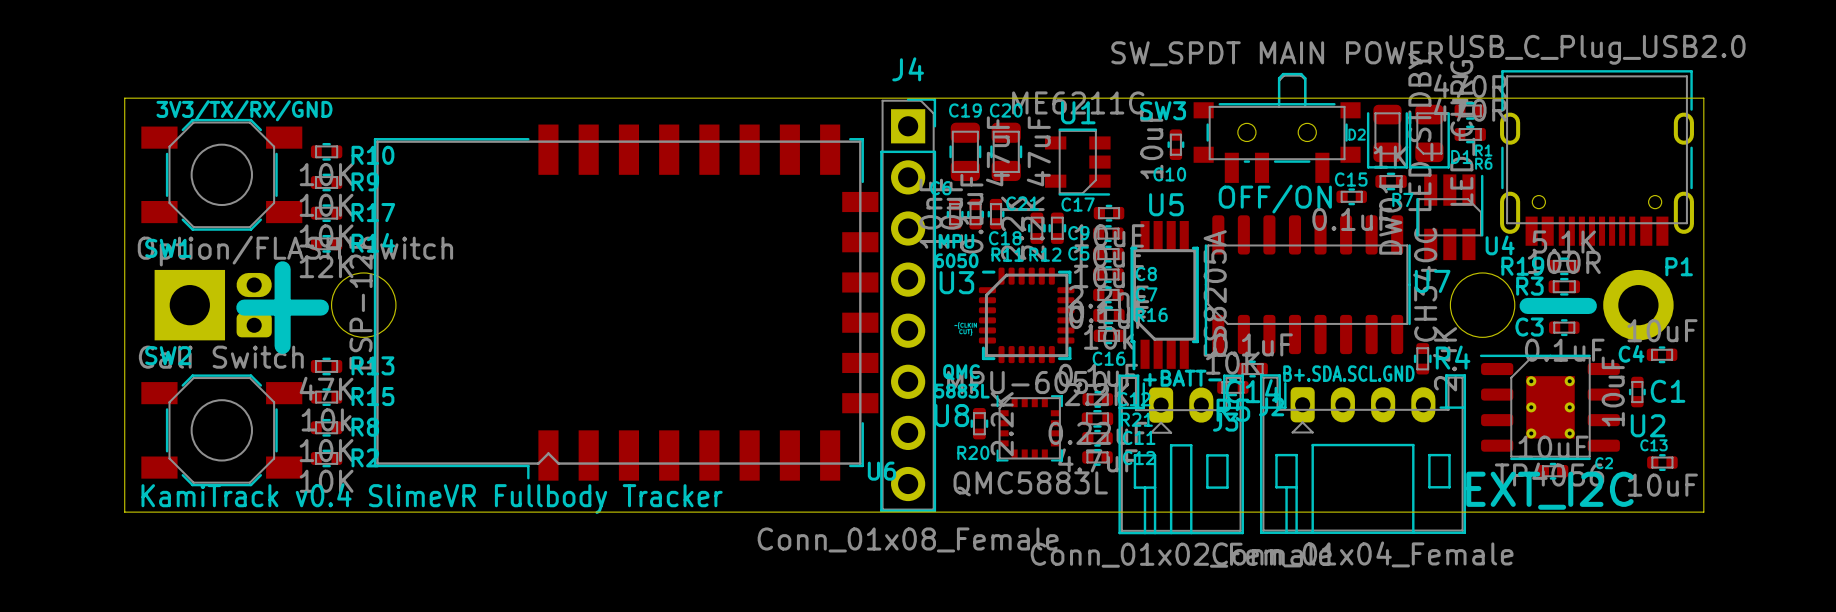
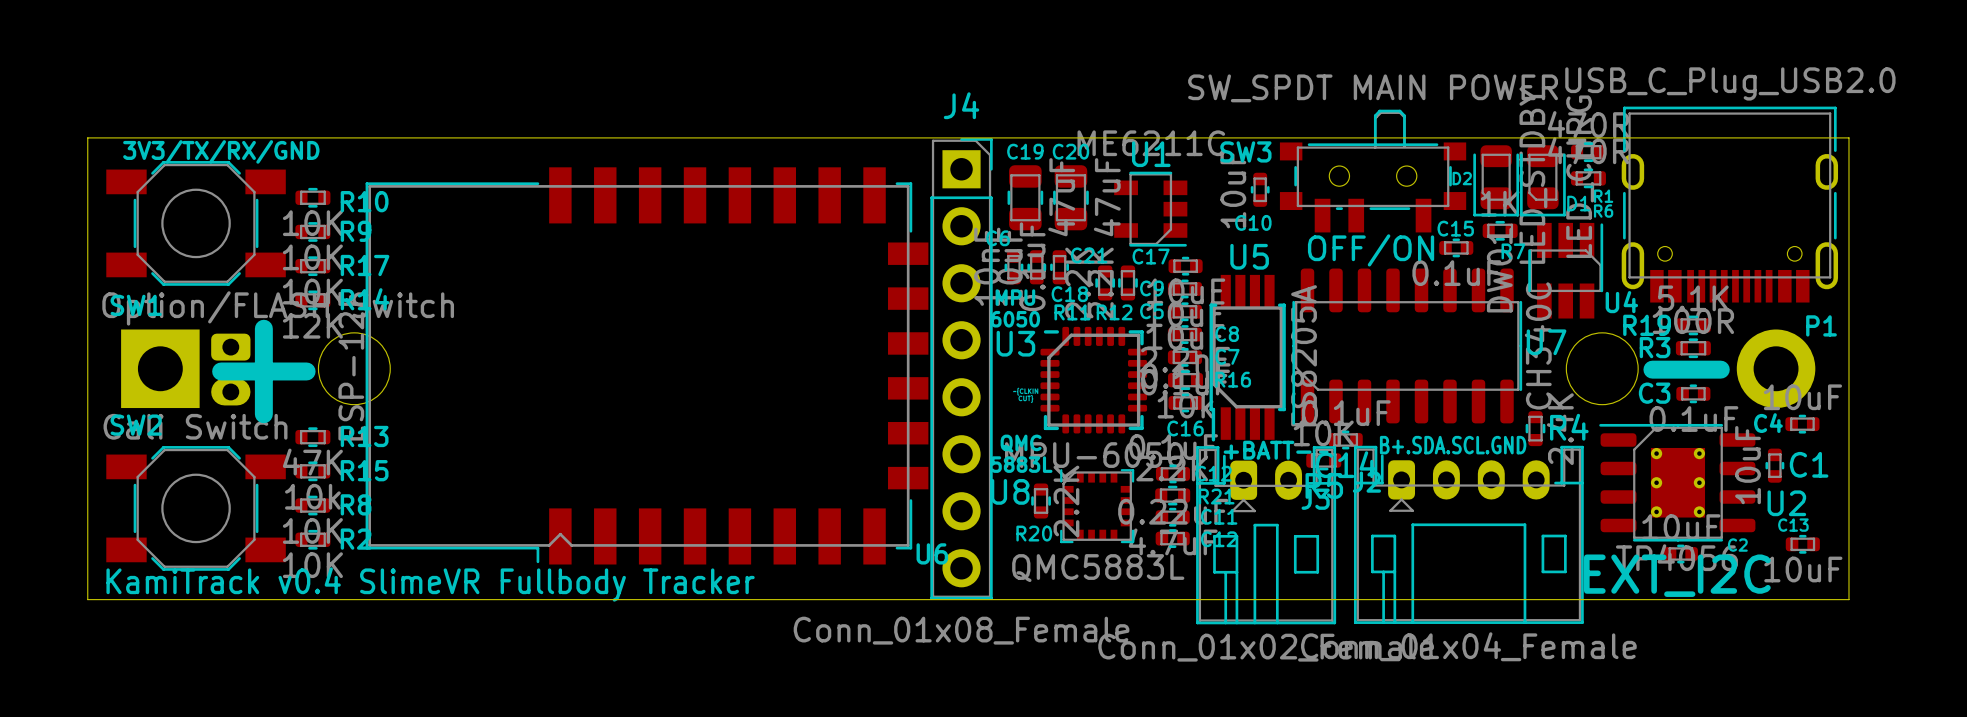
part rotation: 0° (254, 305) -> 180° (230, 369)

